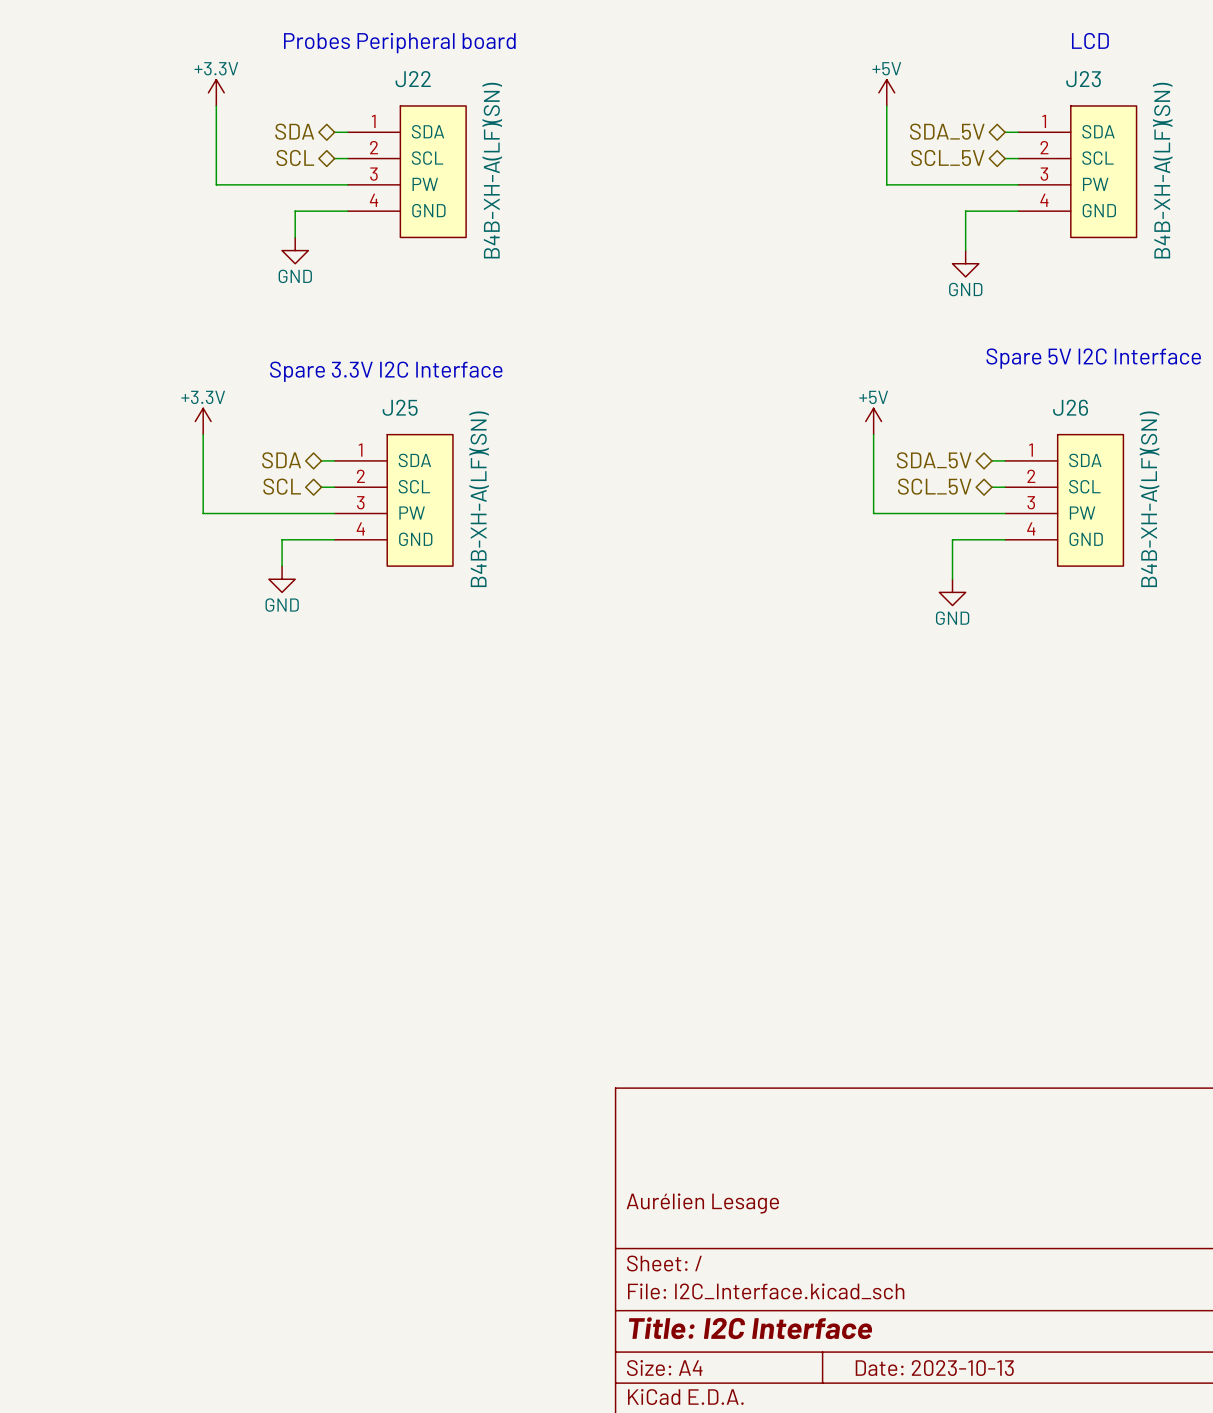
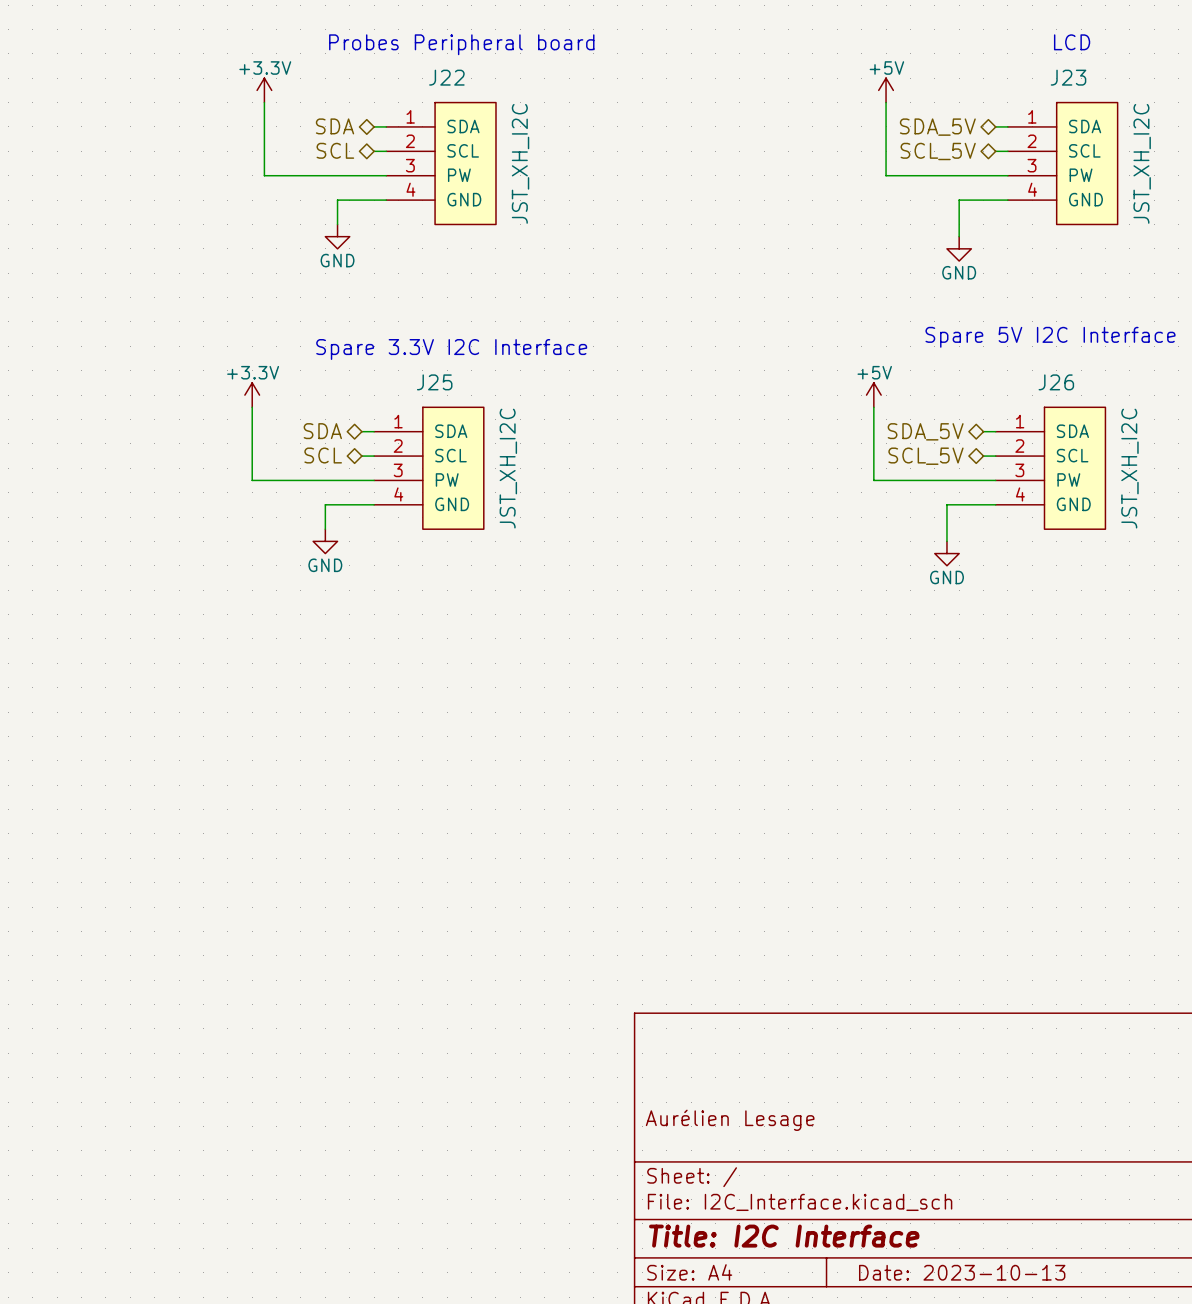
J22 value: B4B-XH-A(LF)(SN) (492, 170) -> JST_XH_I2C (520, 163)
J23 value: B4B-XH-A(LF)(SN) (1162, 170) -> JST_XH_I2C (1142, 163)
J25 value: B4B-XH-A(LF)(SN) (479, 499) -> JST_XH_I2C (508, 468)
J26 value: B4B-XH-A(LF)(SN) (1149, 499) -> JST_XH_I2C (1129, 468)

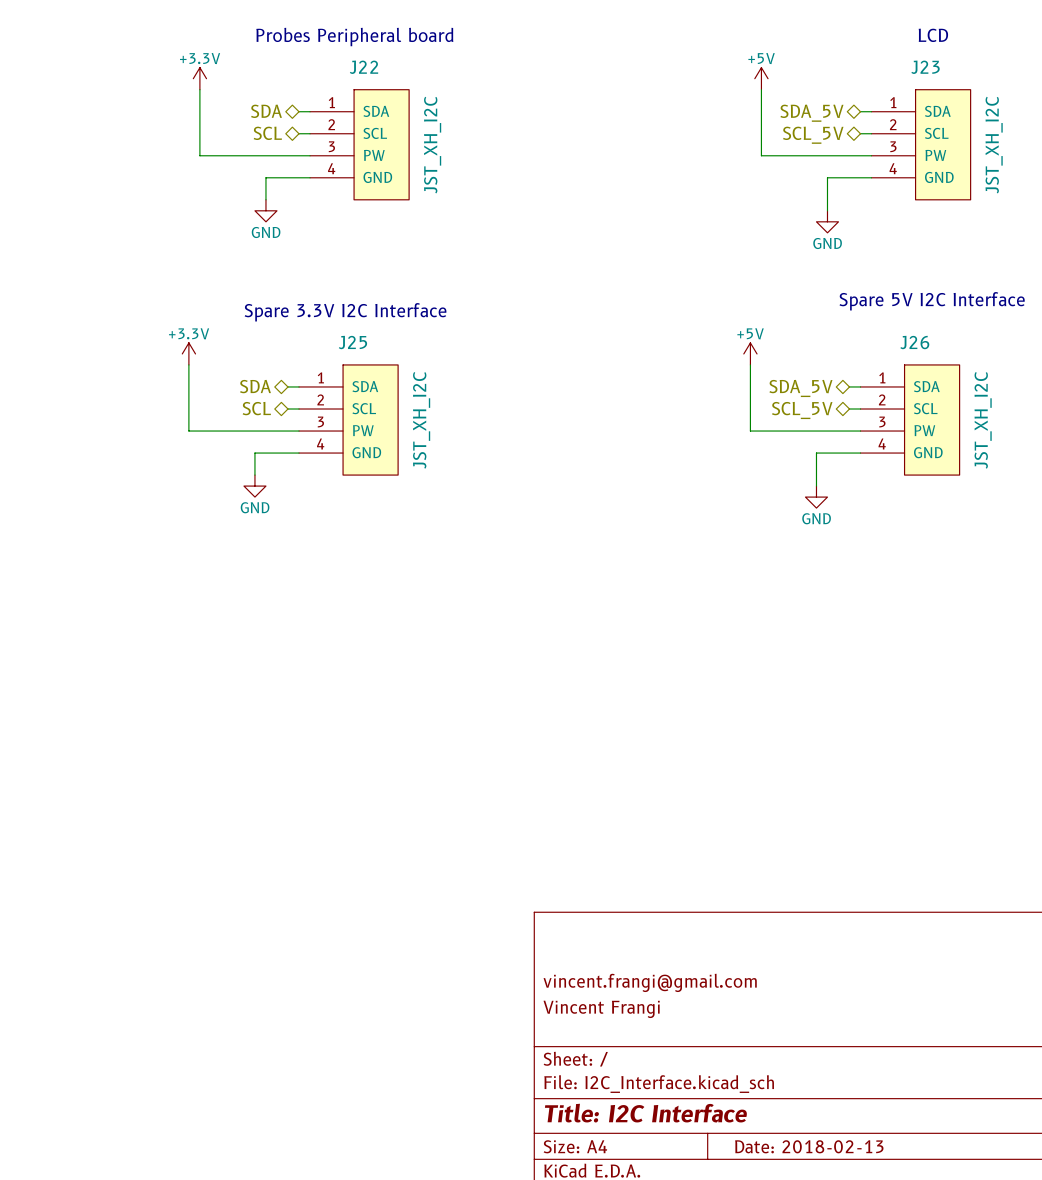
title block: none -> vincent.frangi@gmail.com (650, 982)
title block: Aurélien Lesage (730, 1120) -> Vincent Frangi (601, 1009)
title block: Date: 2023-10-13 (962, 1272) -> Date: 2018-02-13 (809, 1146)

